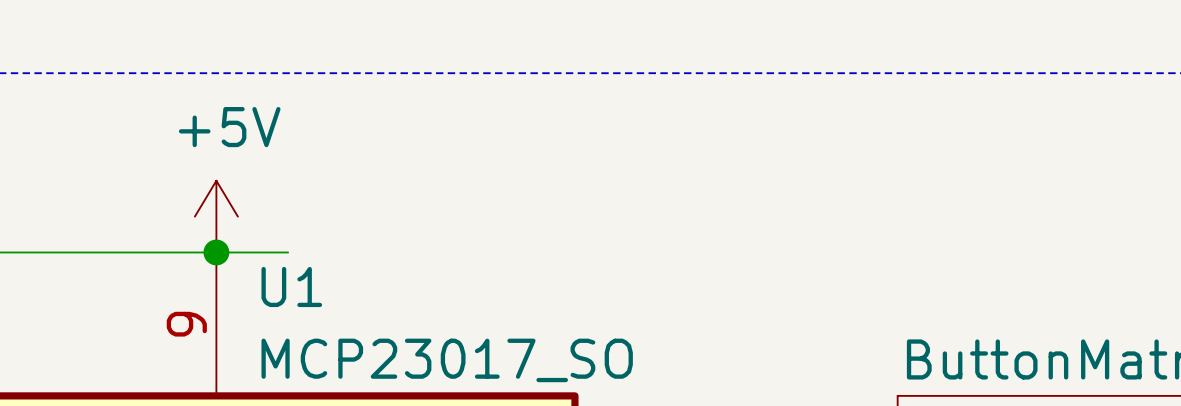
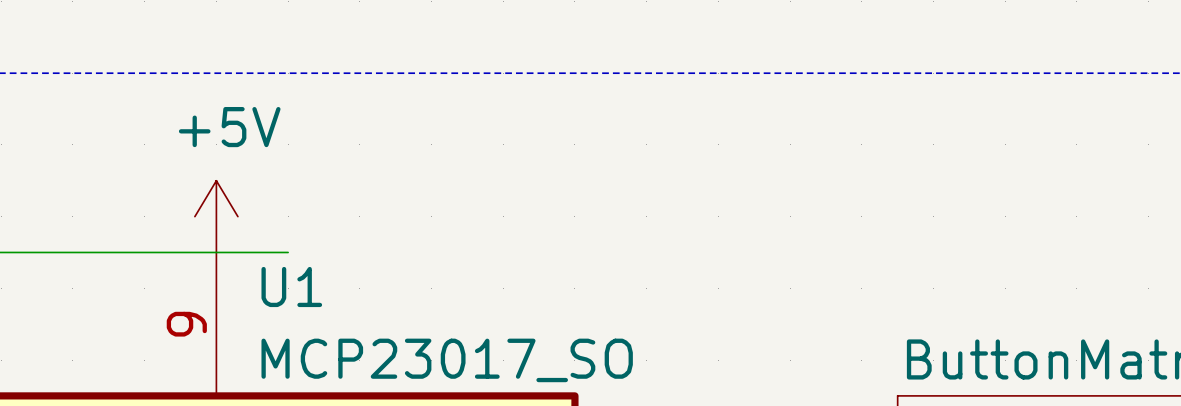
junction: (216, 252) -> none

